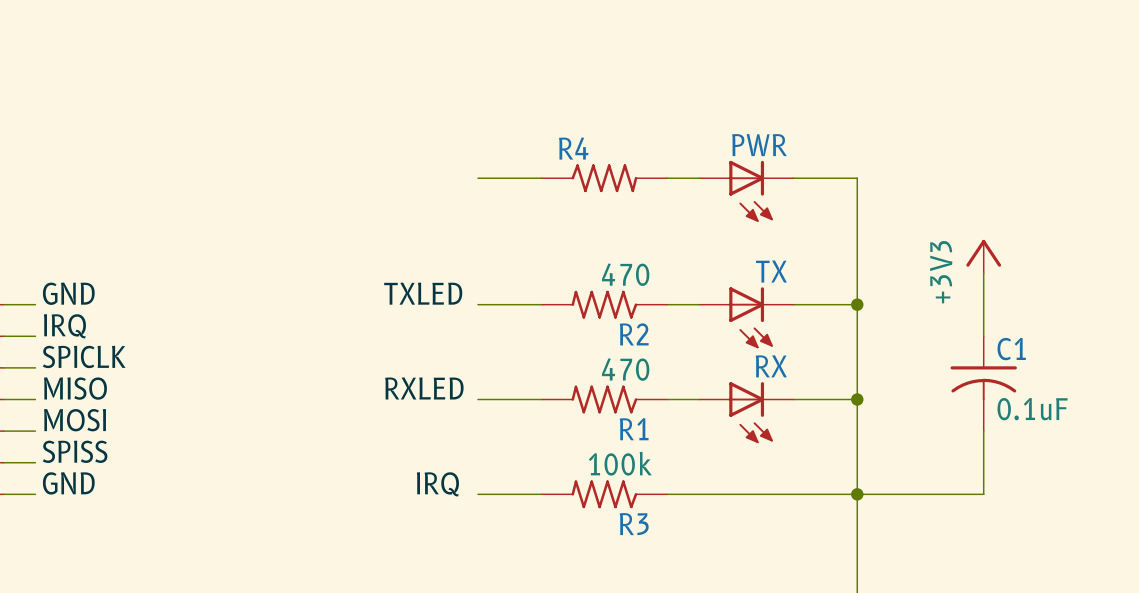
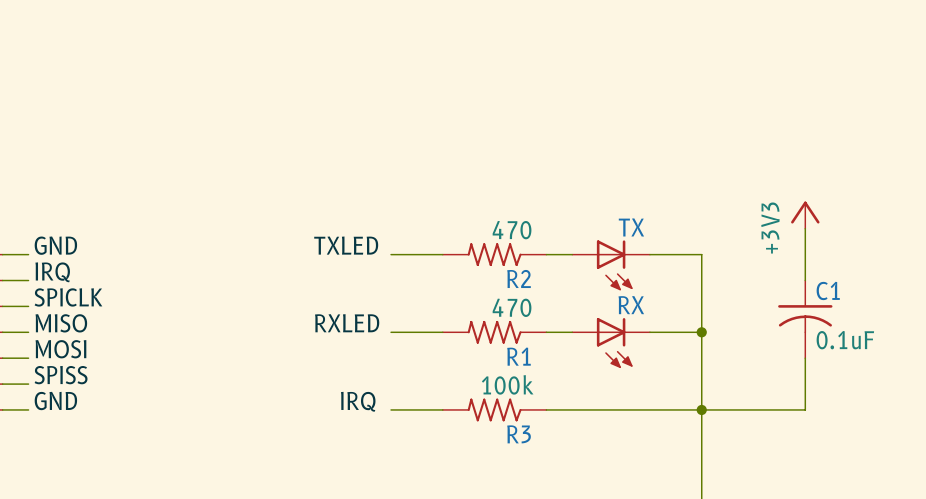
wire: (477, 178) (541, 178) -> none
R4: (604, 178) -> none
wire: (667, 178) (699, 178) -> none
wire: (794, 178) (857, 178) (857, 304) -> none
PWR: (746, 191) -> none
junction: (857, 304) -> none

